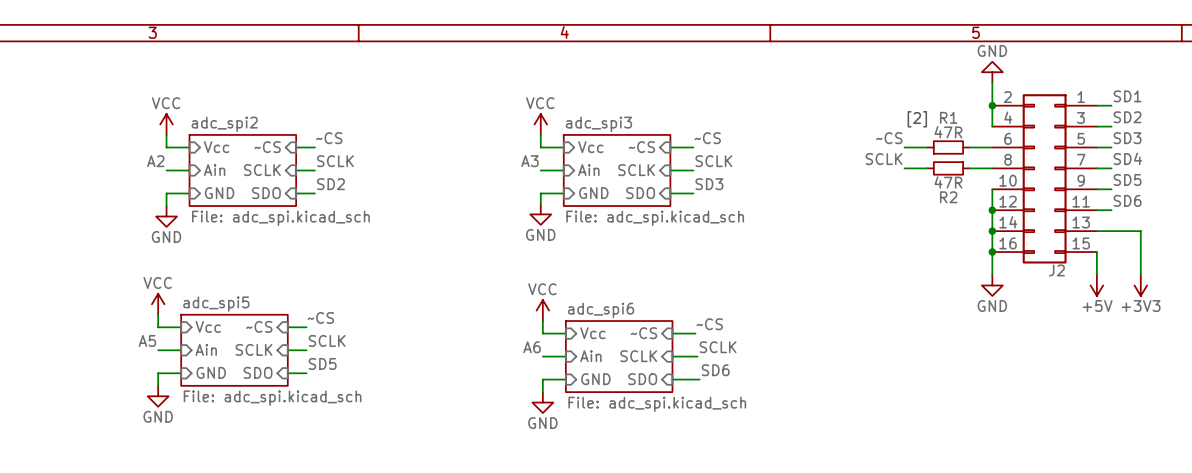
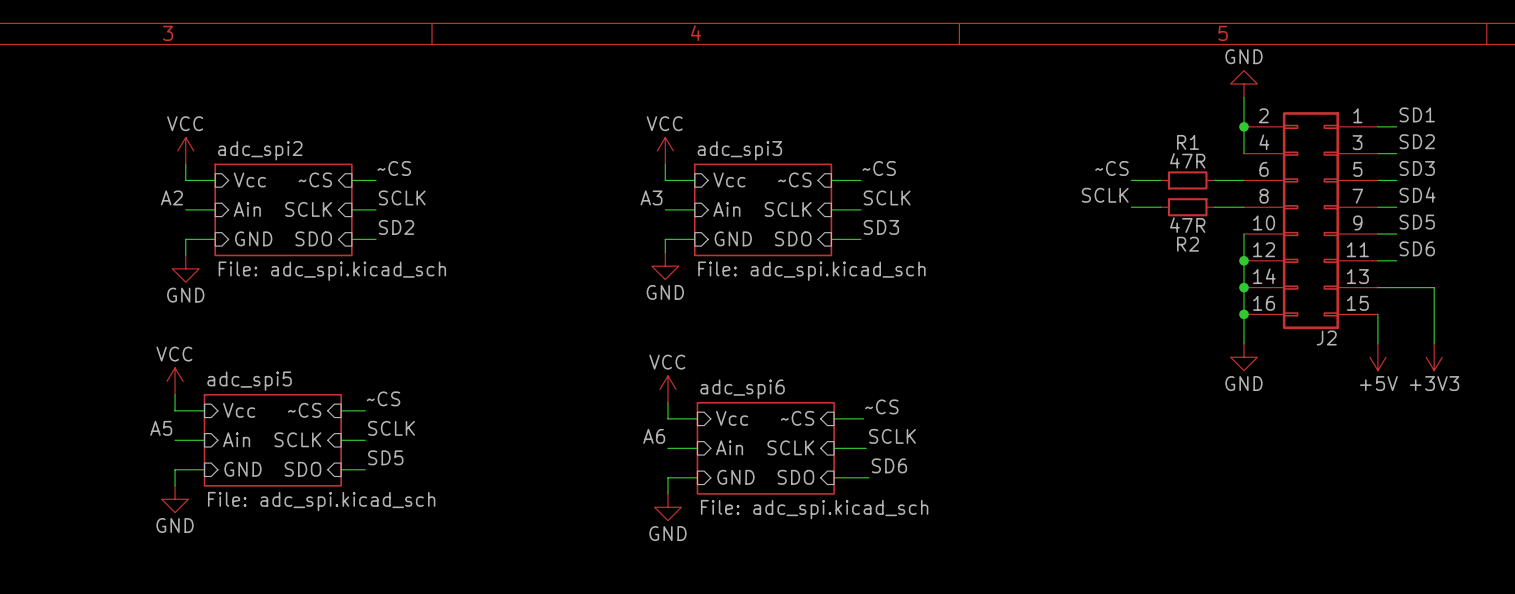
text: [2] (917, 119) -> none

